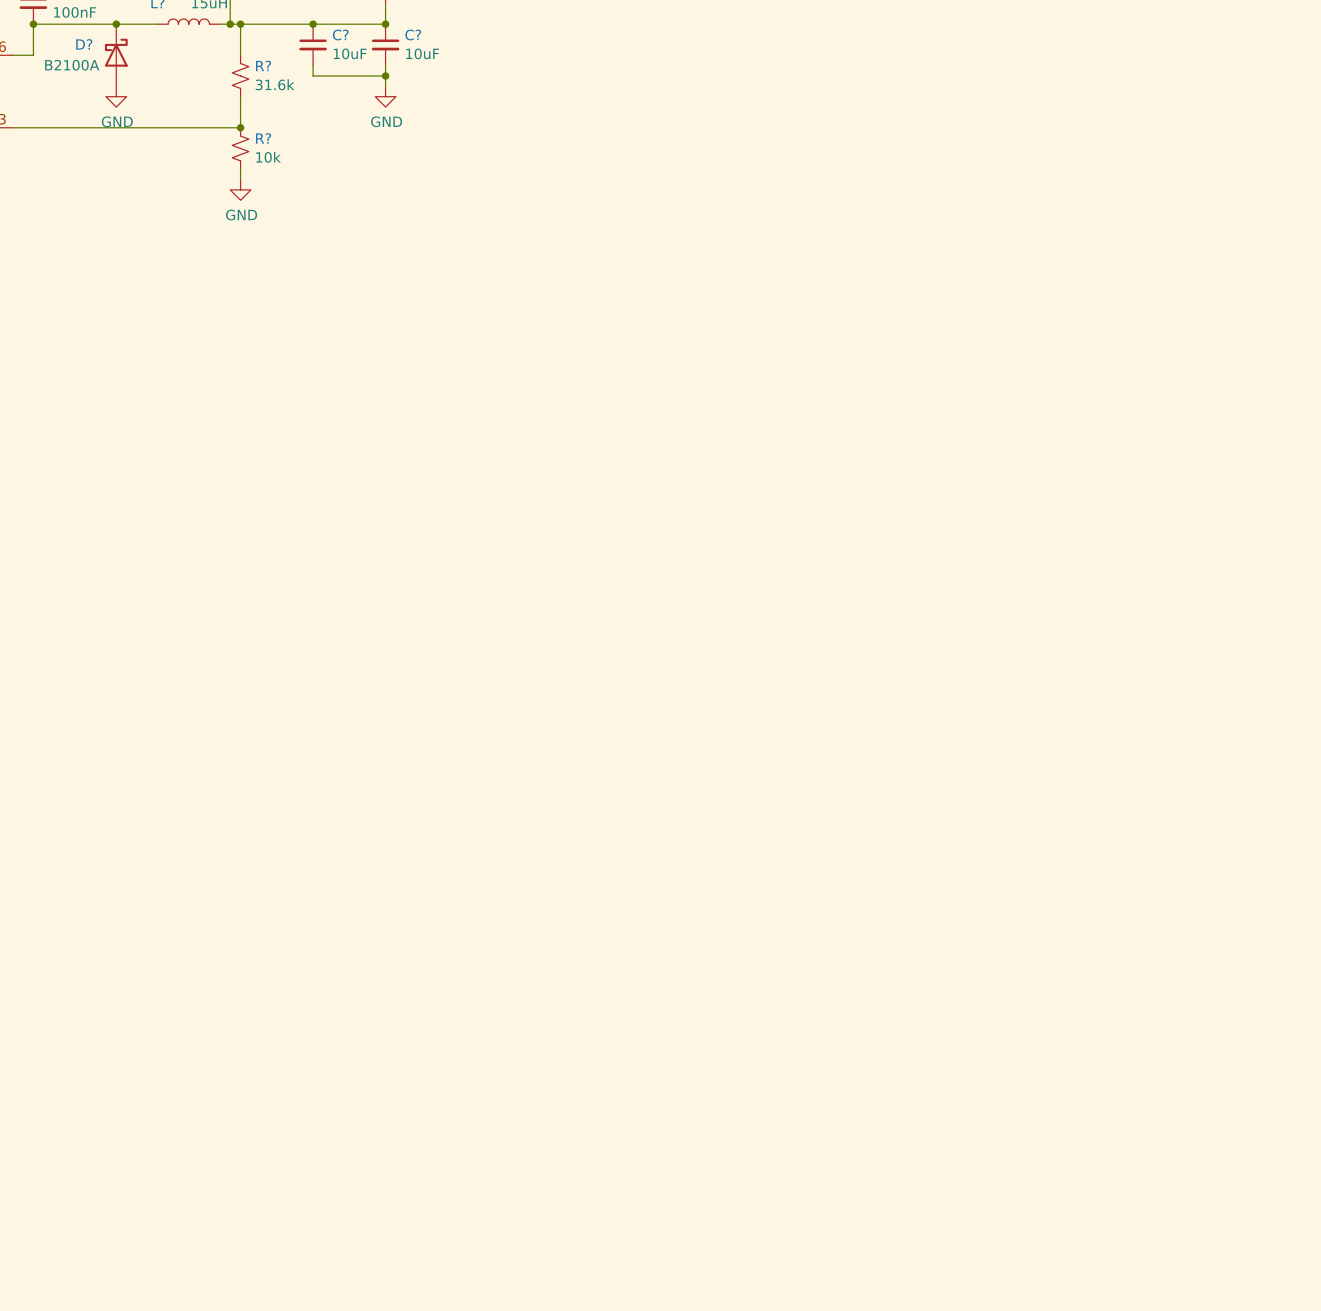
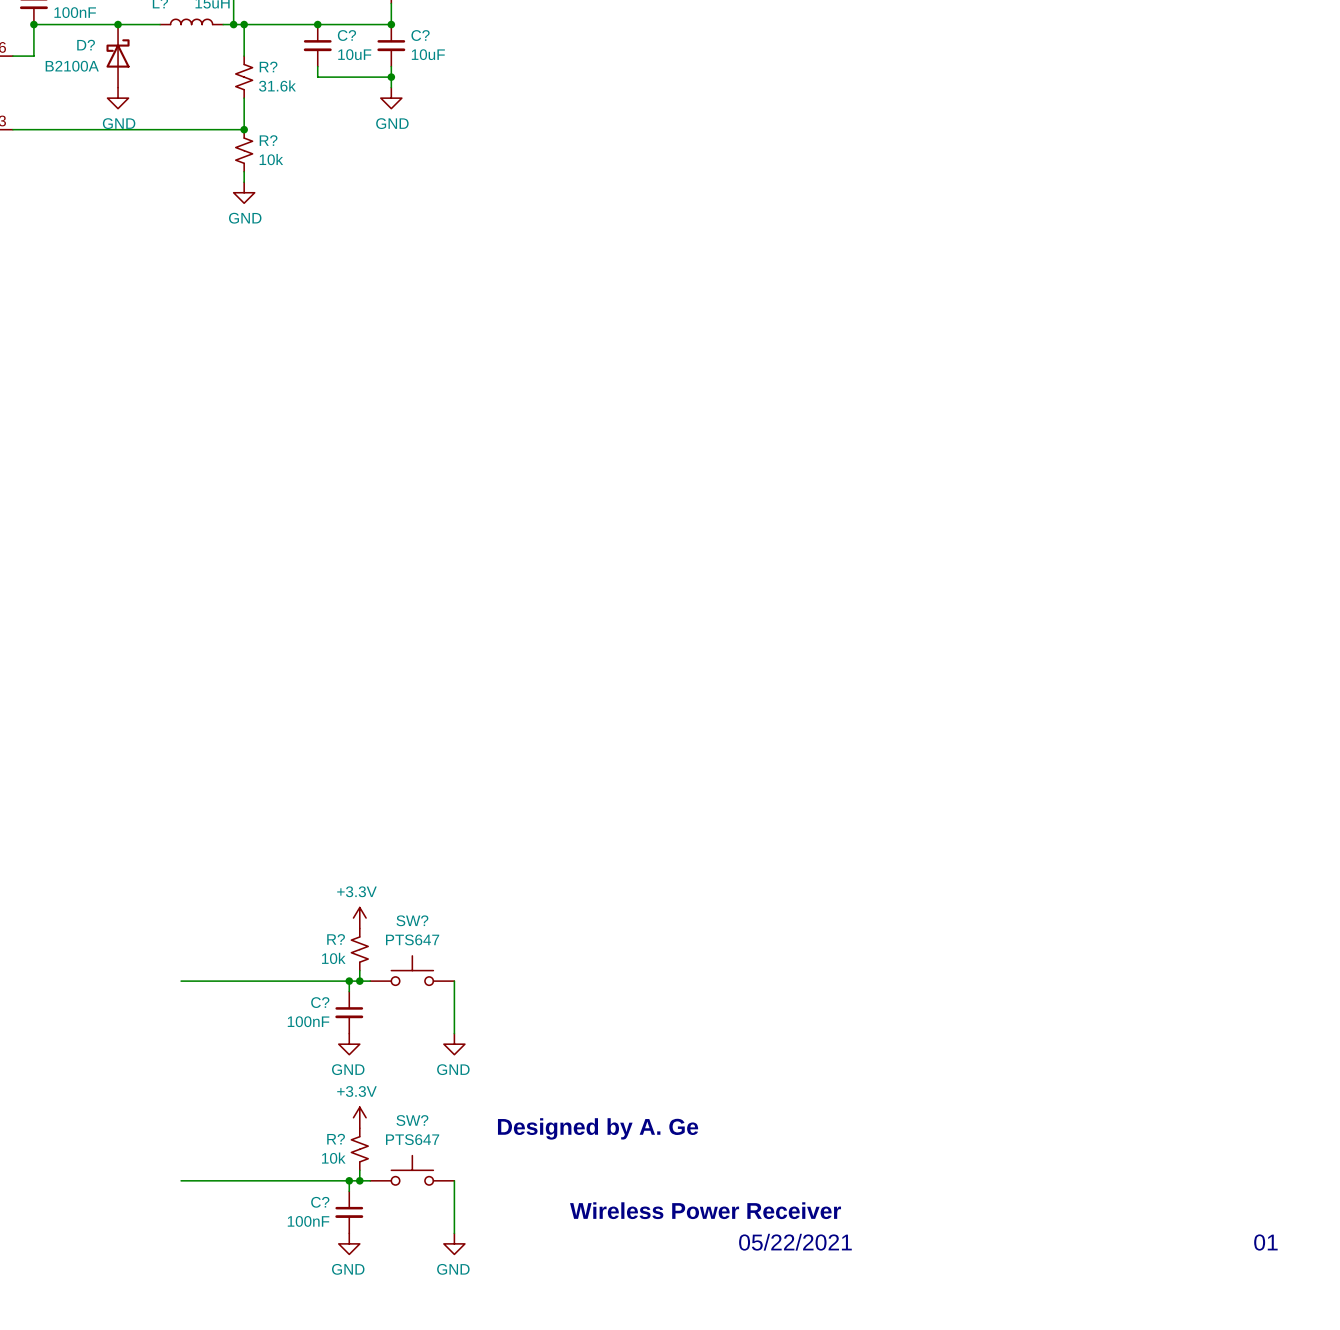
power symbol: none -> +3.3V (359, 918)
R?: none -> 10k (359, 949)
wire: none -> (359, 970) (359, 981)
SW?: none -> PTS647 (412, 970)
wire: none -> (181, 981) (370, 981)
wire: none -> (349, 981) (349, 991)
junction: none -> (349, 981)
junction: none -> (359, 981)
wire: none -> (454, 981) (454, 1033)
C?: none -> 100nF (349, 1012)
power symbol: none -> GND (349, 1044)
power symbol: none -> GND (454, 1044)
power symbol: none -> +3.3V (359, 1117)
text: none -> Designed by A. Ge (598, 1128)
R?: none -> 10k (359, 1149)
wire: none -> (359, 1170) (359, 1180)
SW?: none -> PTS647 (412, 1170)
wire: none -> (181, 1180) (370, 1180)
wire: none -> (349, 1180) (349, 1191)
junction: none -> (349, 1180)
junction: none -> (359, 1180)
wire: none -> (454, 1180) (454, 1233)
text: none -> Wireless Power Receiver (705, 1210)
C?: none -> 100nF (349, 1212)
text: none -> 01 (1265, 1242)
power symbol: none -> GND (349, 1243)
power symbol: none -> GND (454, 1243)
text: none -> 05/22/2021 (795, 1242)

